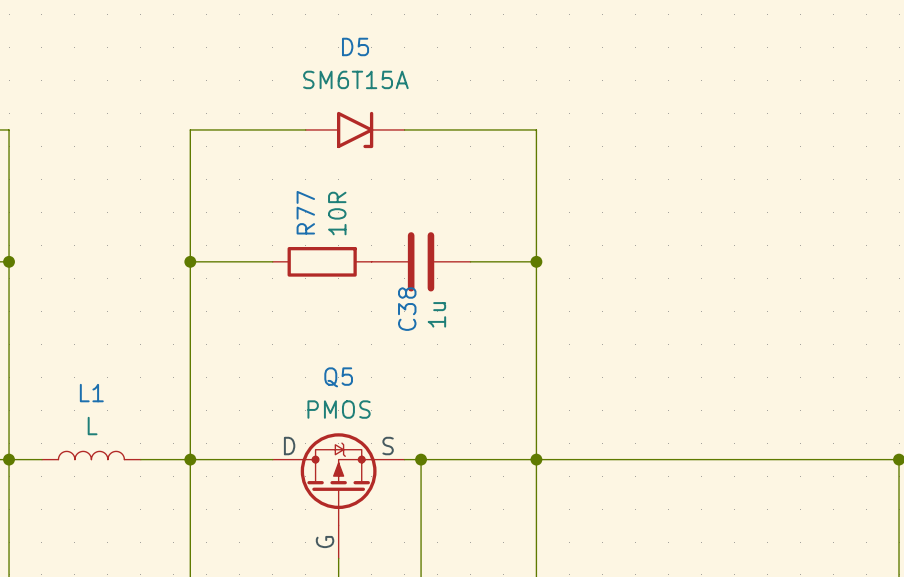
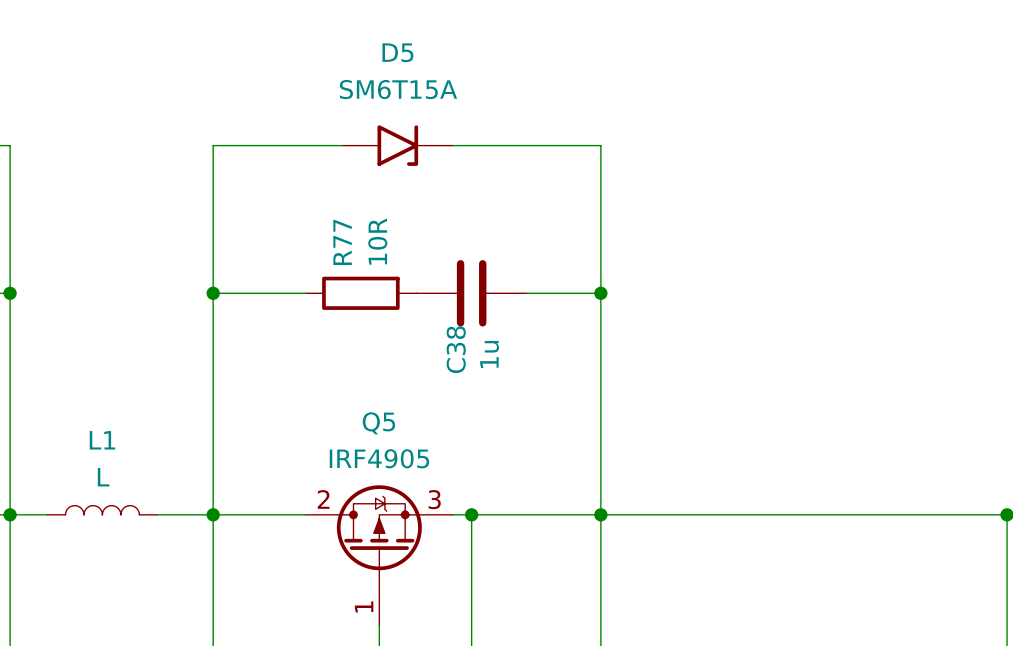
Q5 value: PMOS (339, 409) -> IRF4905 (379, 458)
Q5 pin number: none -> 2 (323, 499)
Q5 pin name: D (289, 446) -> none
Q5 pin number: none -> 3 (434, 499)
Q5 pin name: S (388, 446) -> none
Q5 pin name: G (325, 542) -> none
Q5 pin number: none -> 1 (364, 606)

